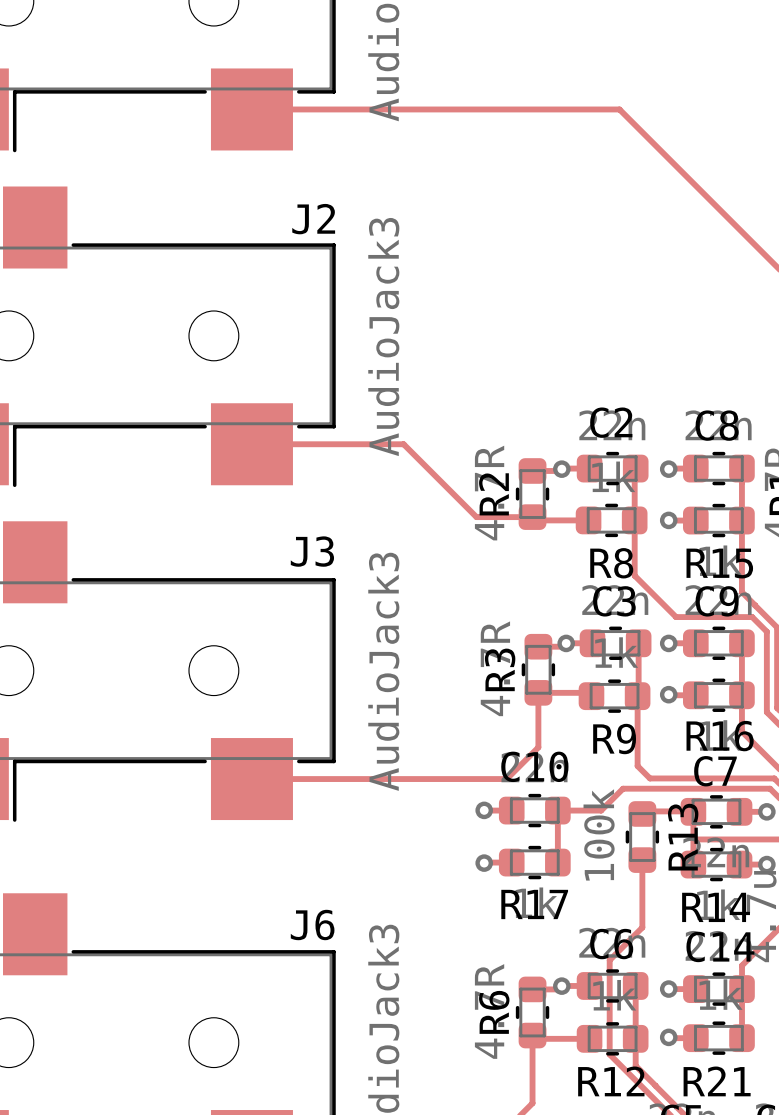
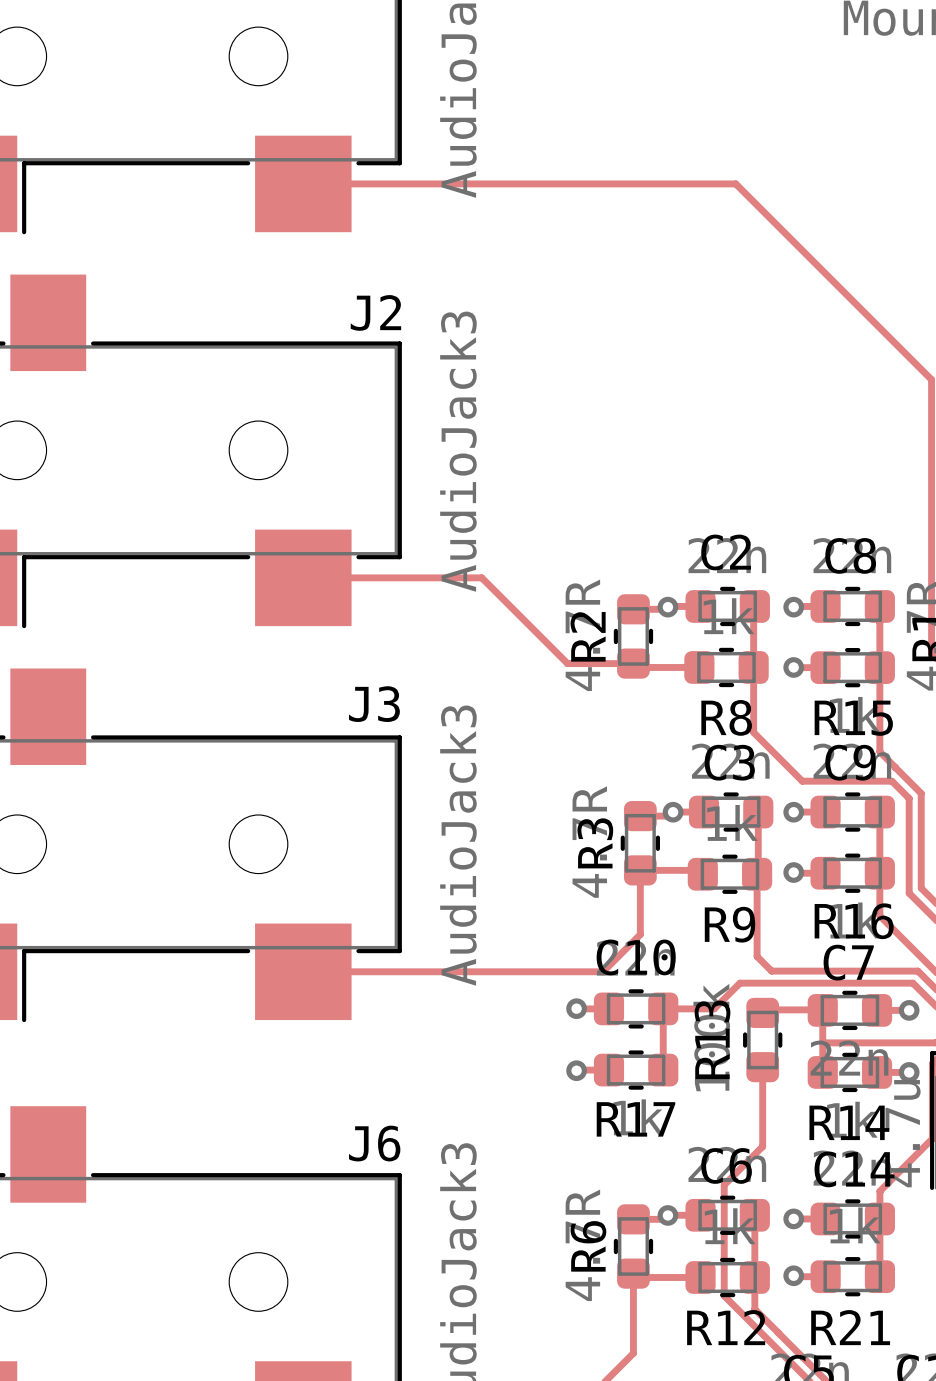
R13 name position: R13 (683, 837) -> R13 (712, 1039)

